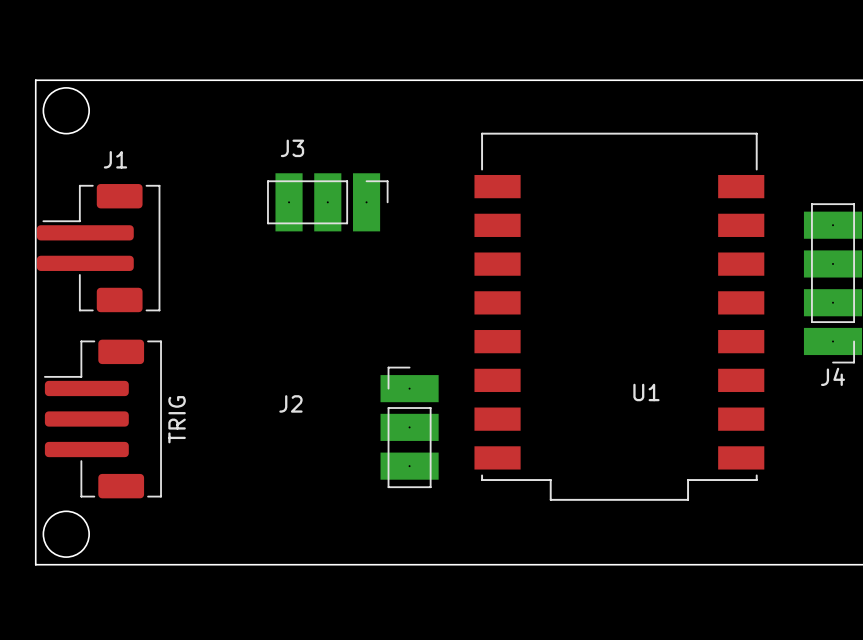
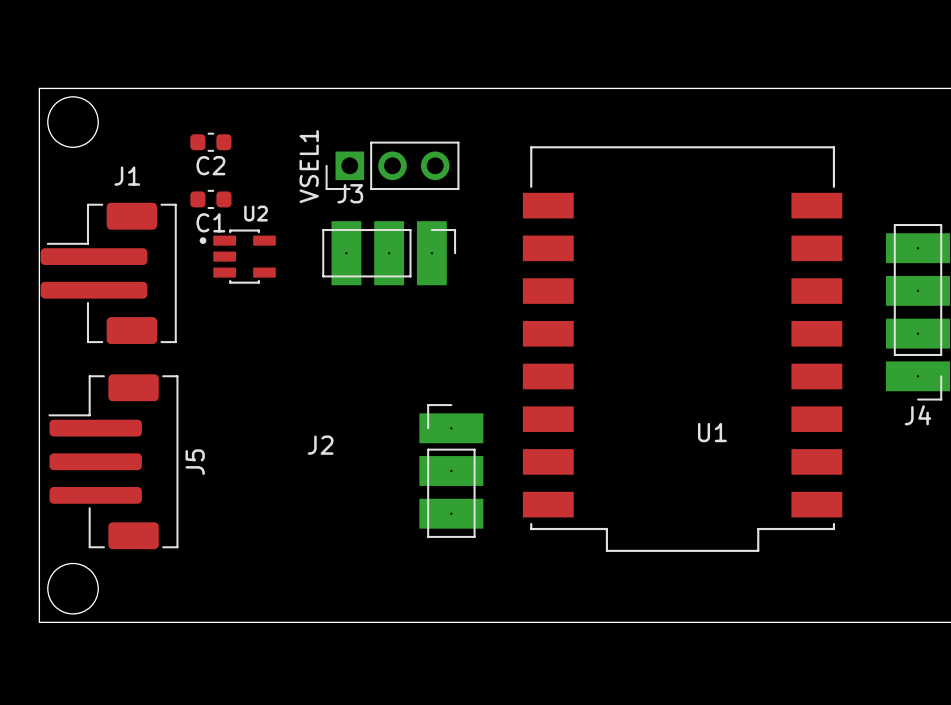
C2: none -> (210, 142)
VSEL1: none -> (392, 165)
C1: none -> (210, 199)
J3 position: (327, 202) -> (389, 253)
U2: none -> (237, 256)
TRIG name: TRIG (177, 419) -> J5 (195, 462)

